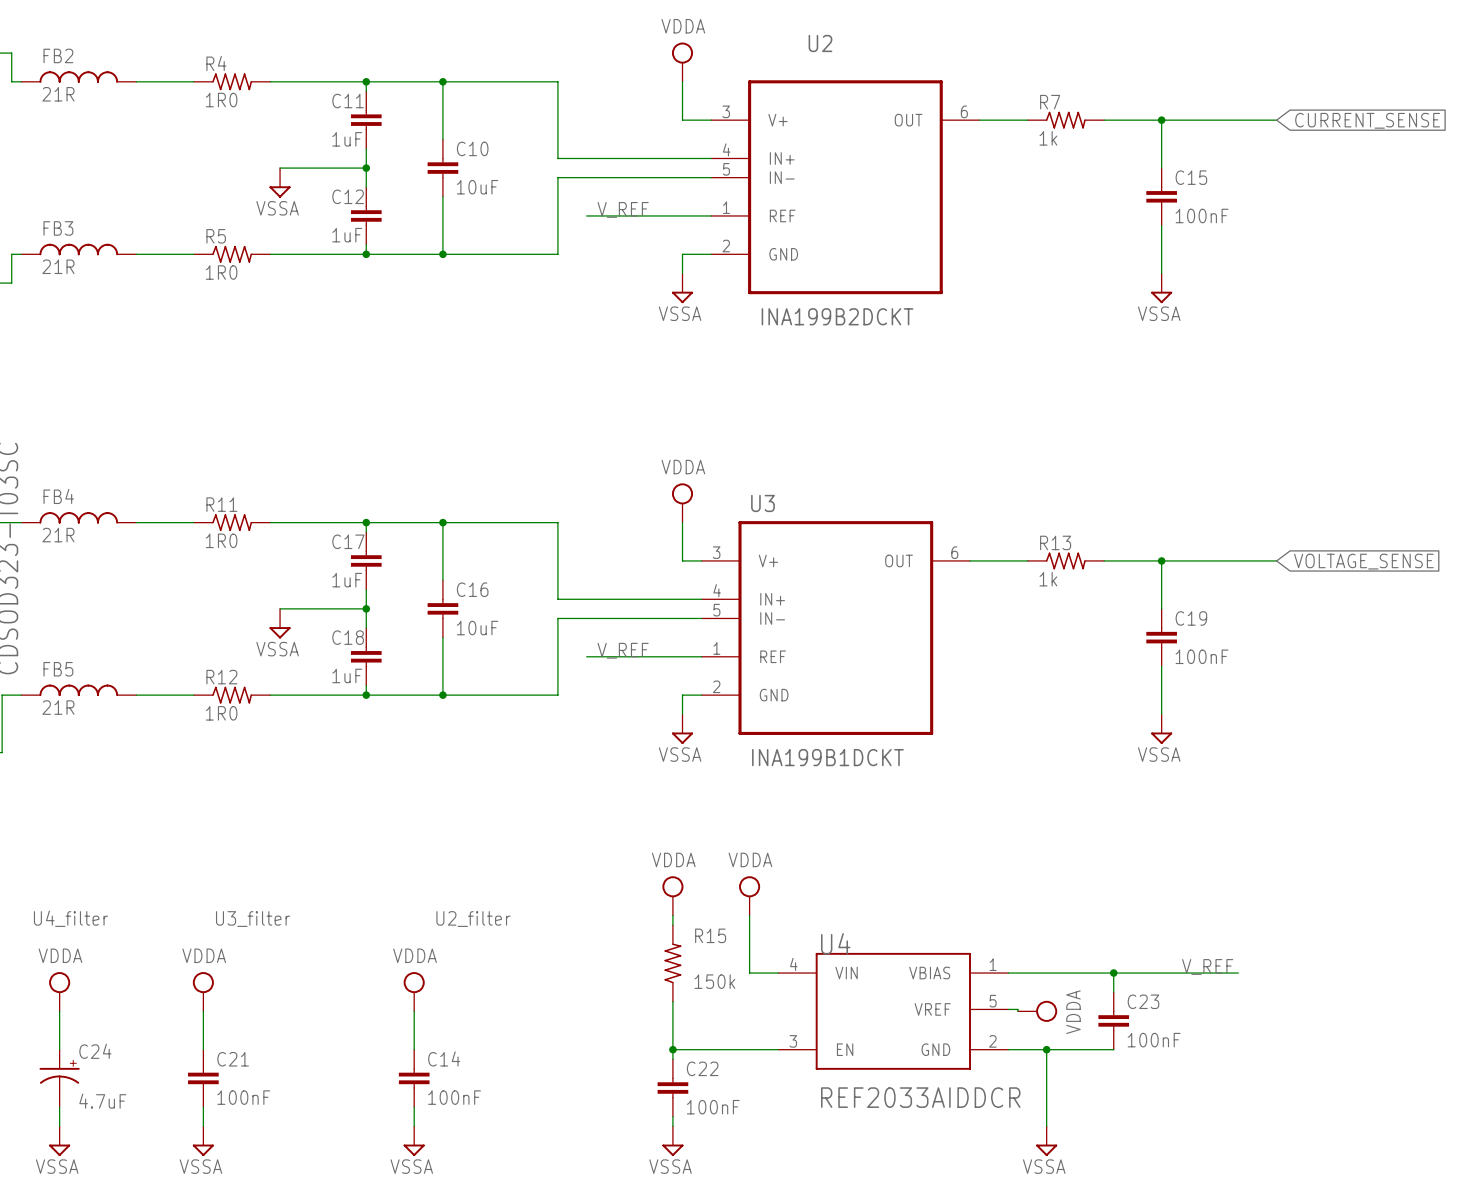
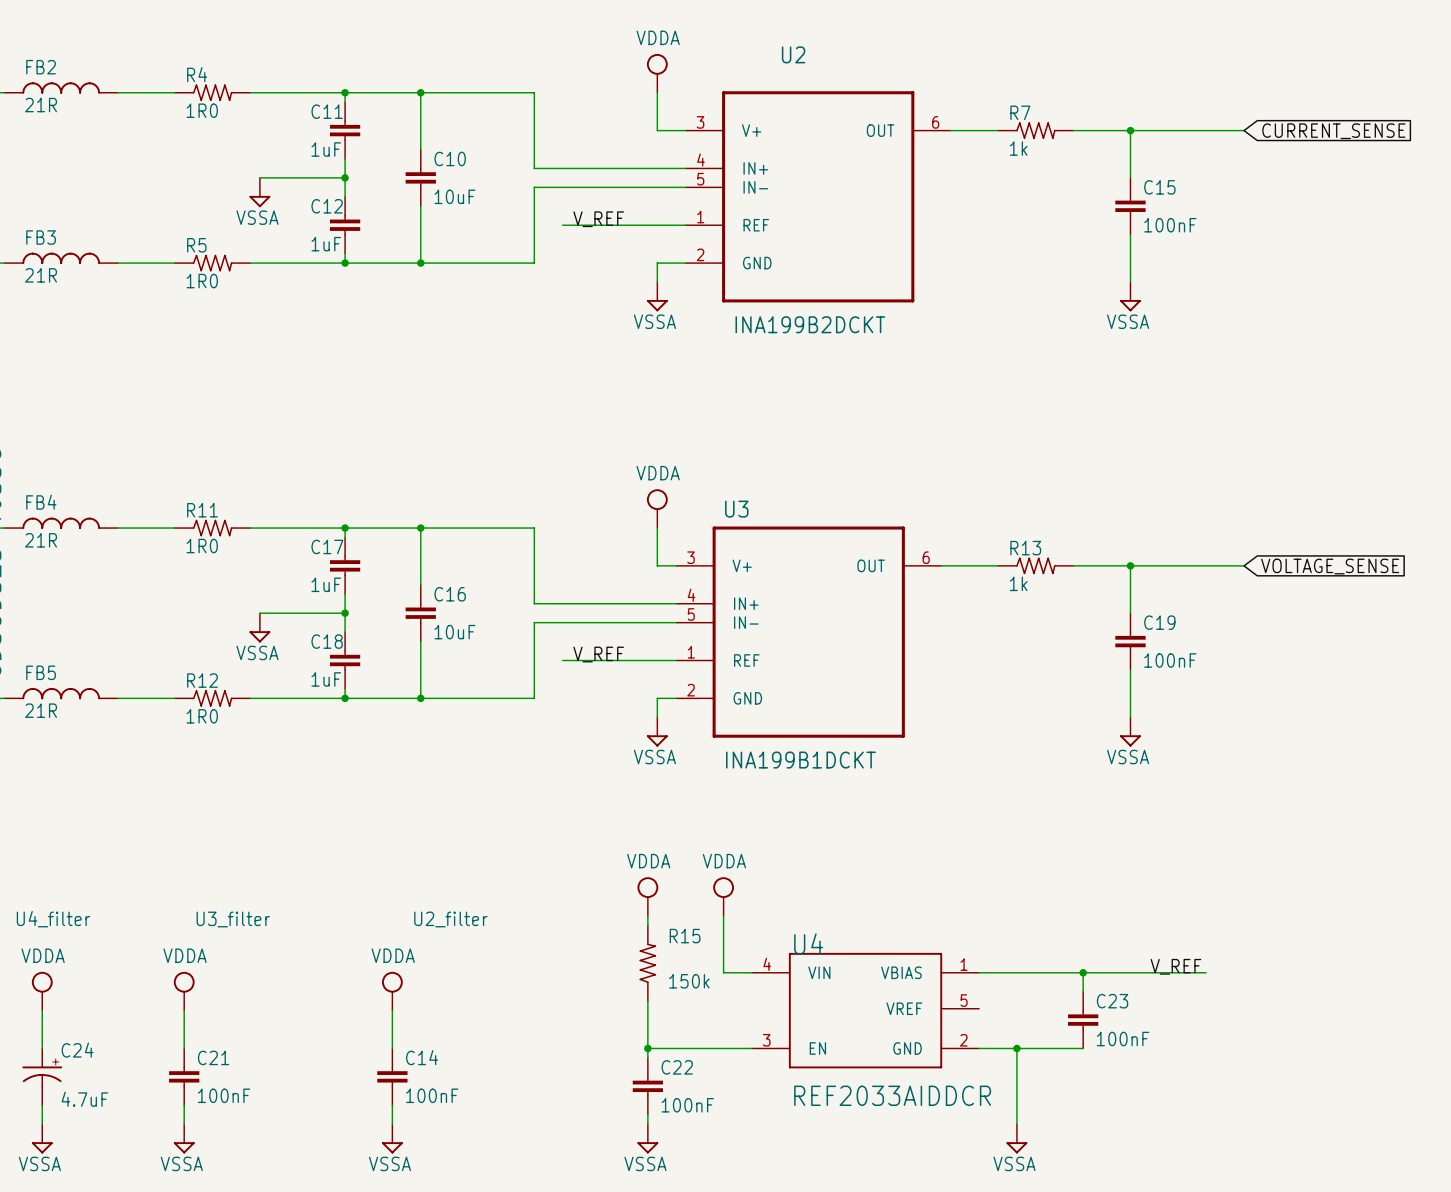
wire: (1008, 1009) (1017, 1009) (1017, 1011) -> none
power symbol: VDDA (1037, 1011) -> none

